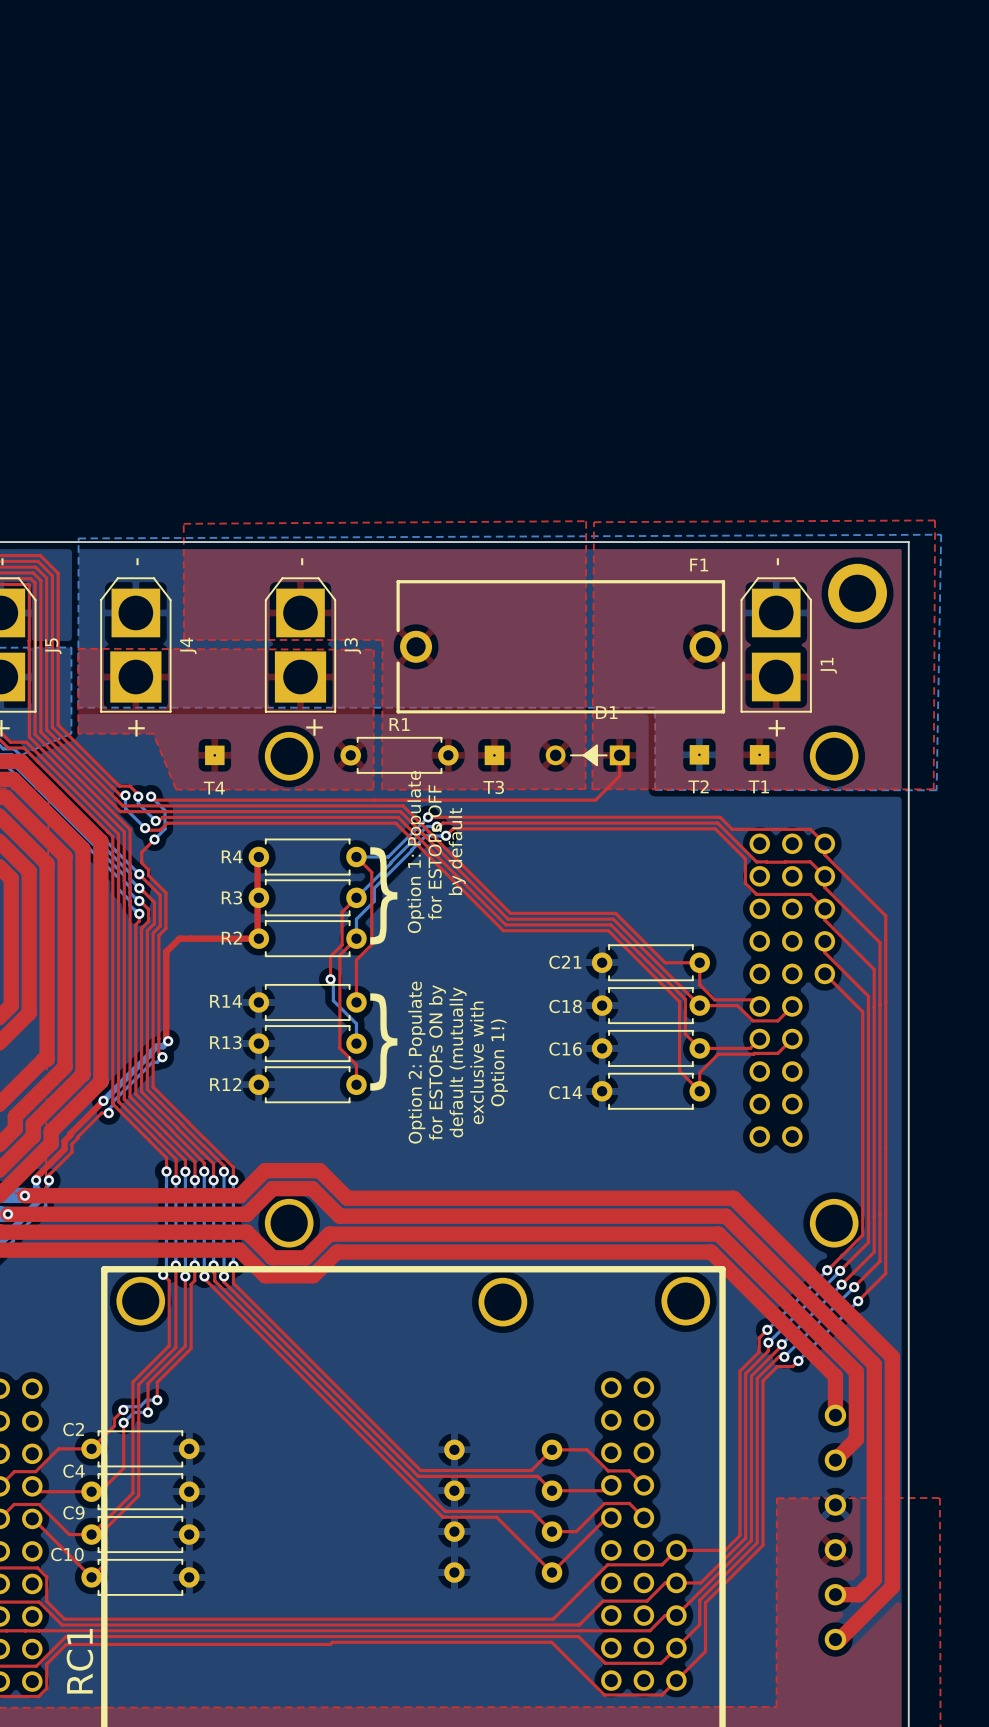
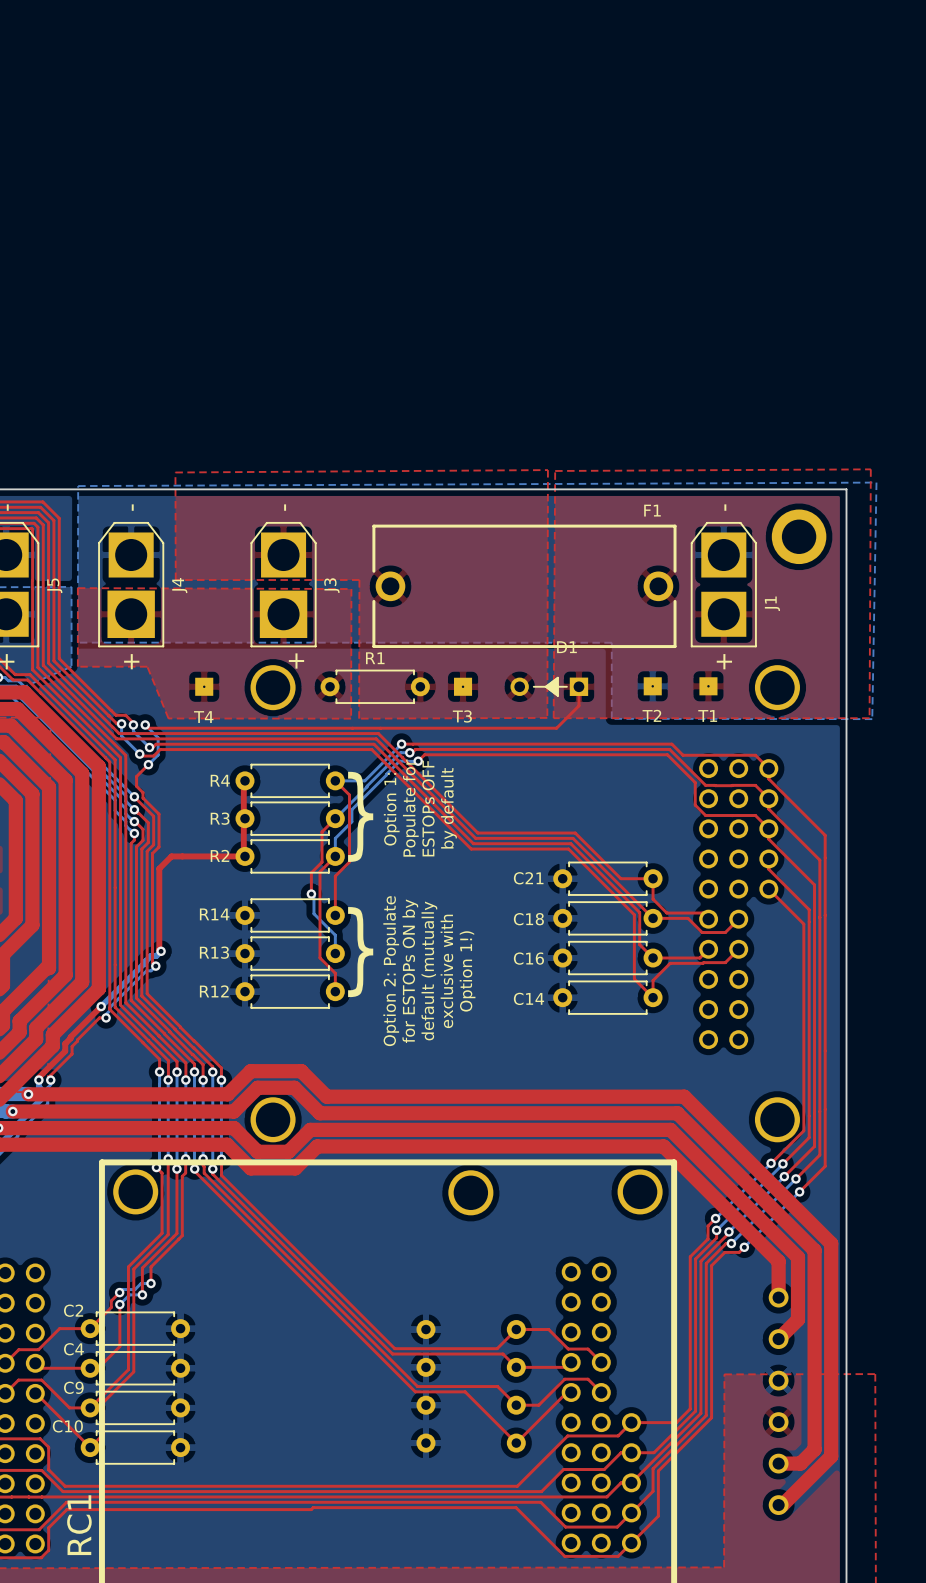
text position: by default (457, 851) -> by default (448, 808)
text: Option 1: Populate (415, 852) -> Option 1: (391, 809)
text: for ESTOPs OFF (434, 852) -> ESTOPs OFF (428, 808)
text: none -> Populate for (410, 808)

